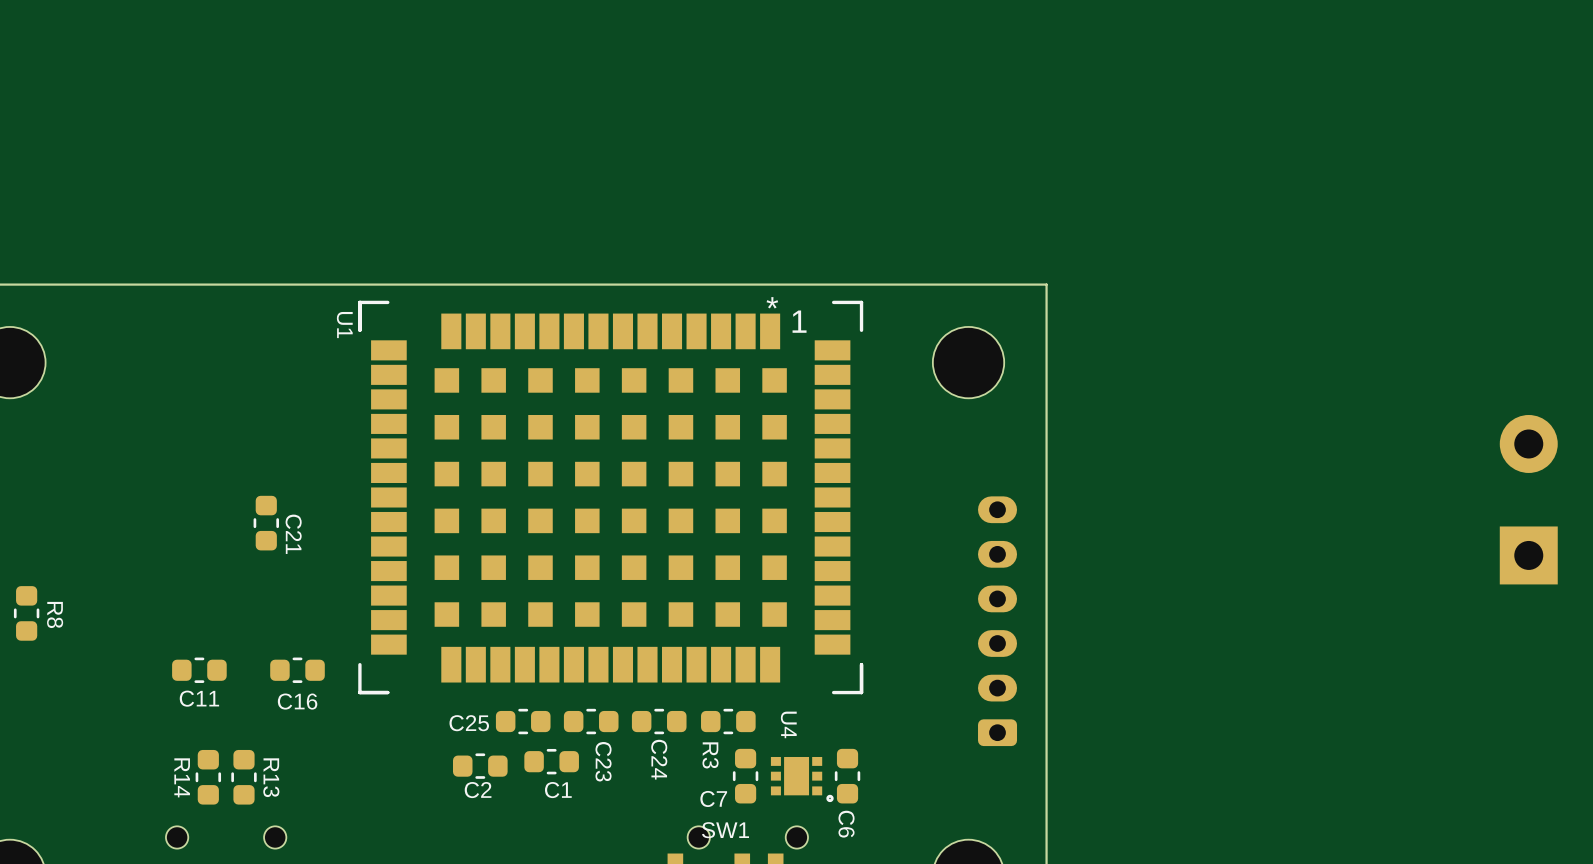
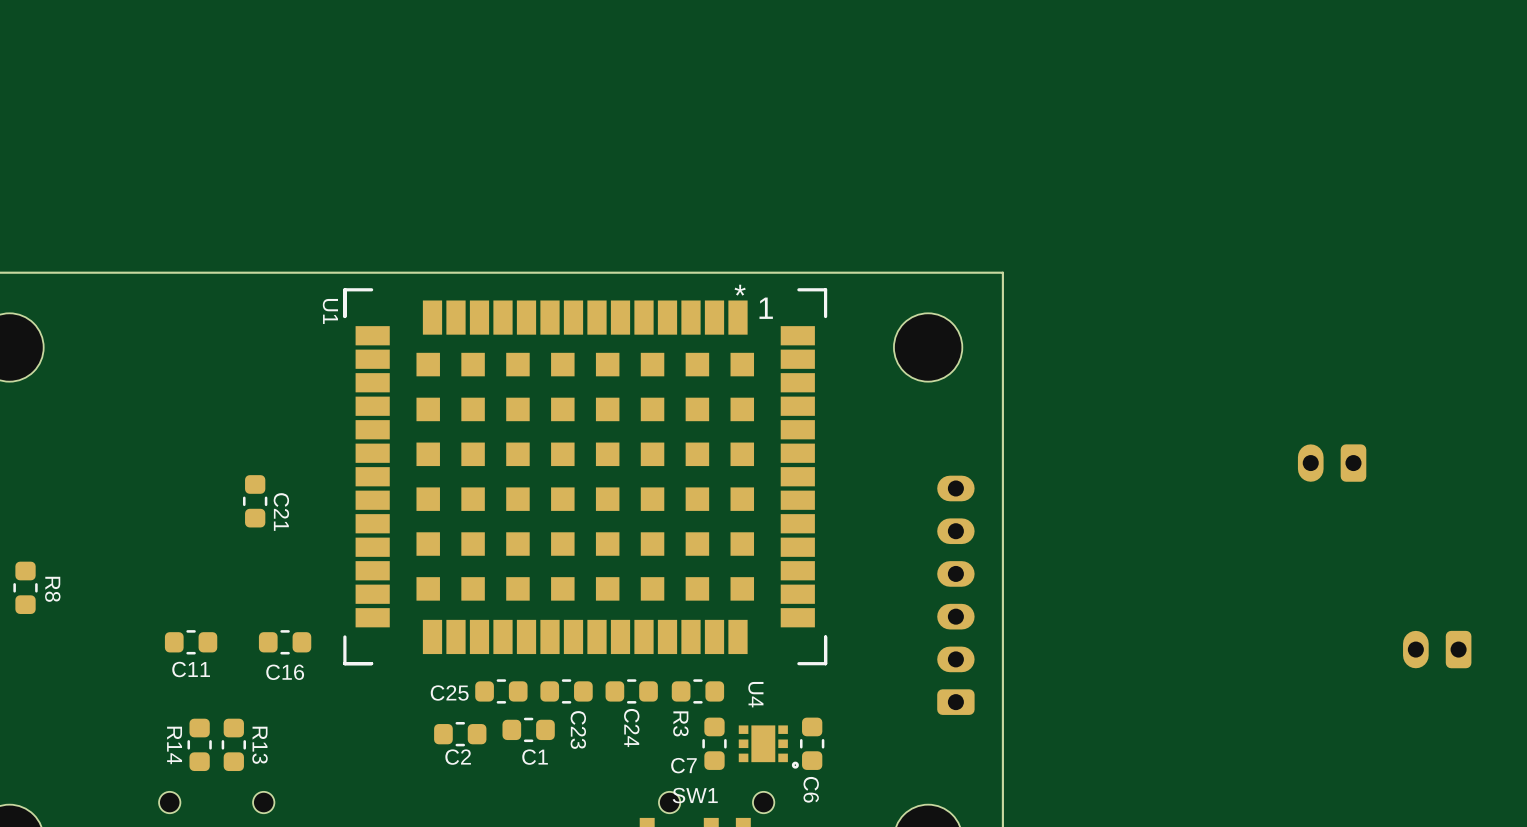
part: none -> (1332, 463)
part: (1528, 499) -> none
part: none -> (1437, 649)

